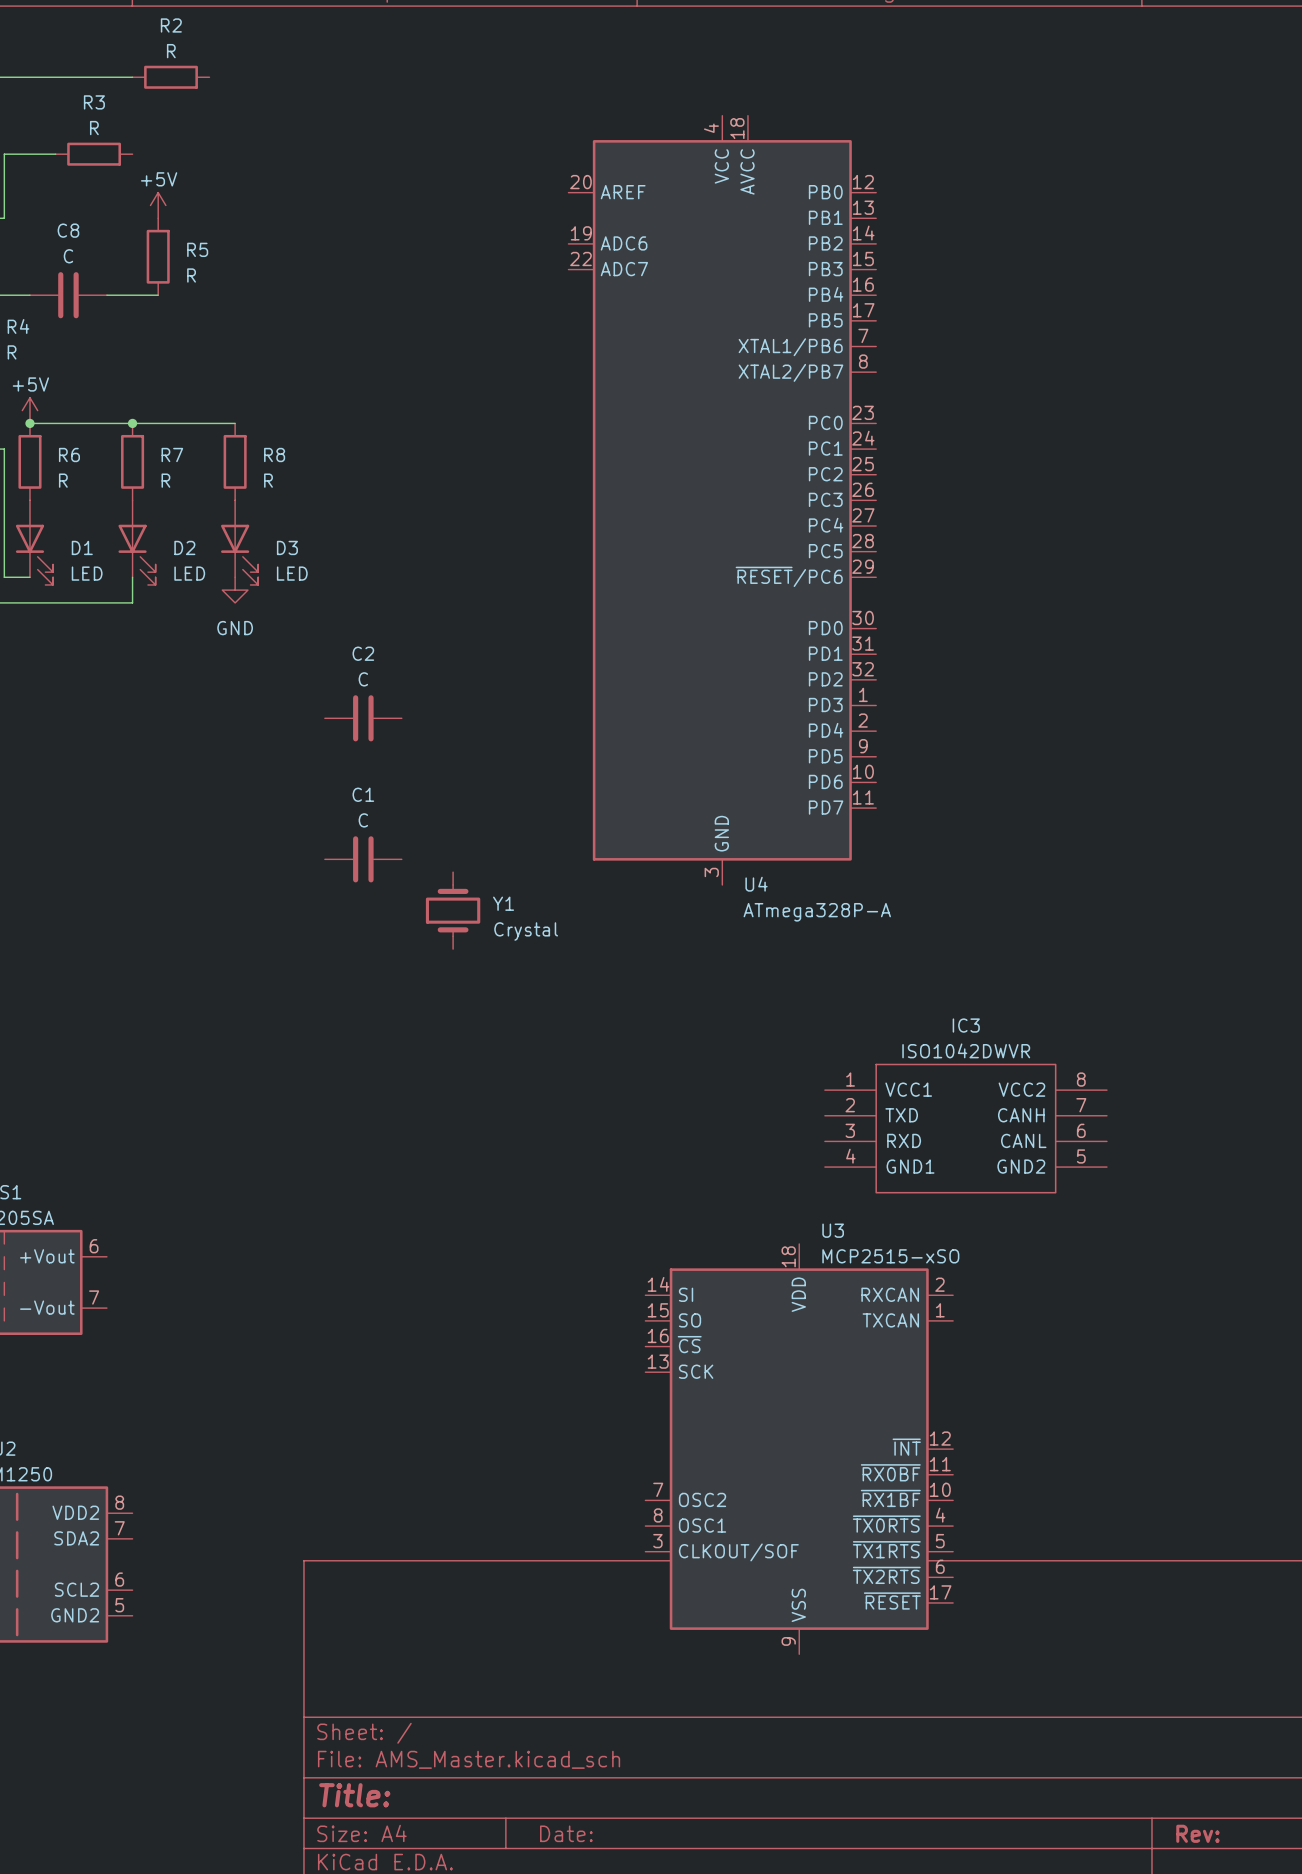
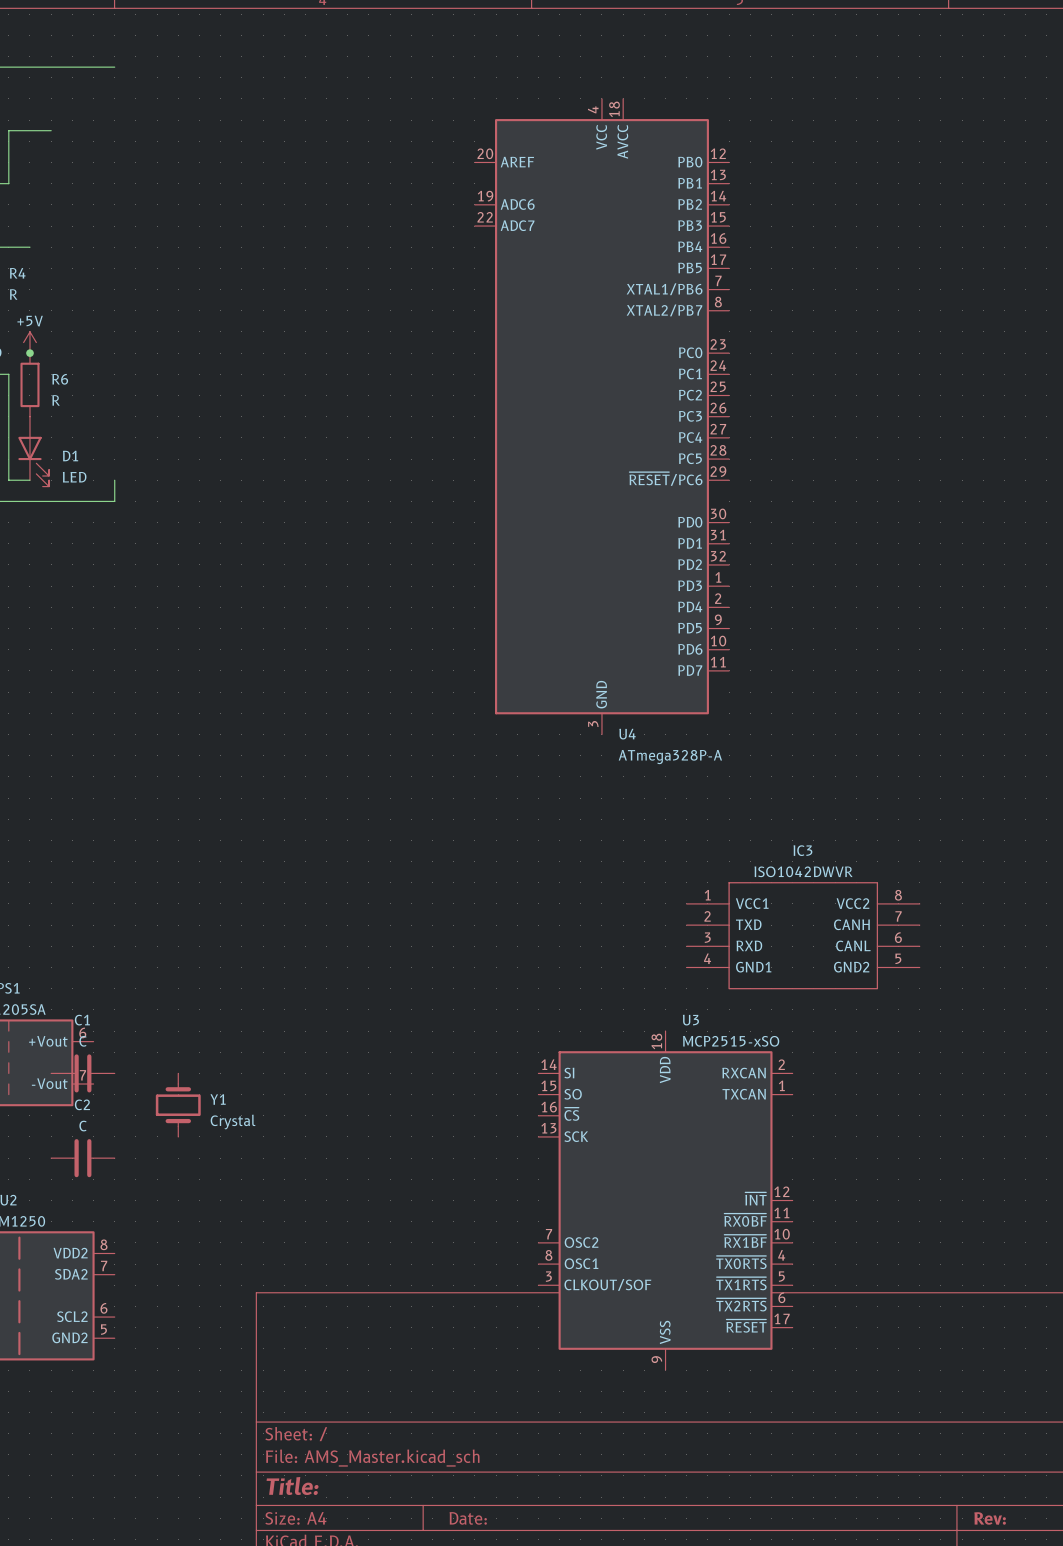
R2: R (171, 77) -> none
R3: R (94, 154) -> none
power symbol: +5V (158, 205) -> none
R5: R (158, 256) -> none
C8: C (68, 295) -> none
wire: (106, 295) (158, 295) -> none
wire: (29, 423) (235, 423) -> none
junction: (132, 423) -> none
R7: R (132, 461) -> none
R8: R (235, 461) -> none
D2: LED (137, 542) -> none
D3: LED (239, 542) -> none
power symbol: GND (235, 590) -> none
C2 position: (363, 718) -> (82, 1158)
C1 position: (363, 859) -> (82, 1073)
Y1 position: (453, 910) -> (178, 1105)

